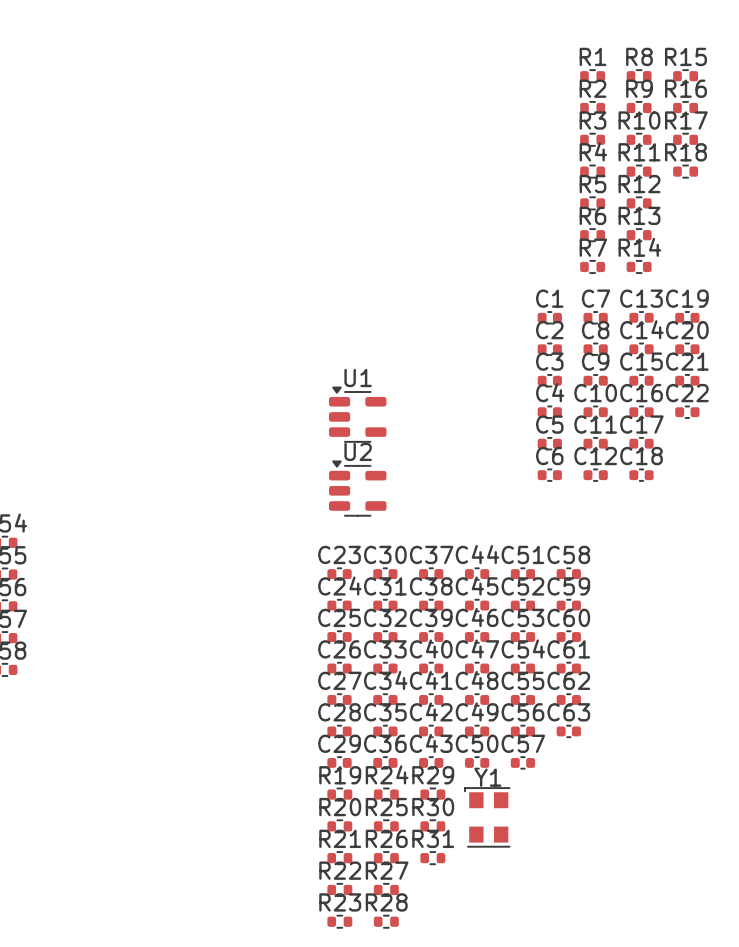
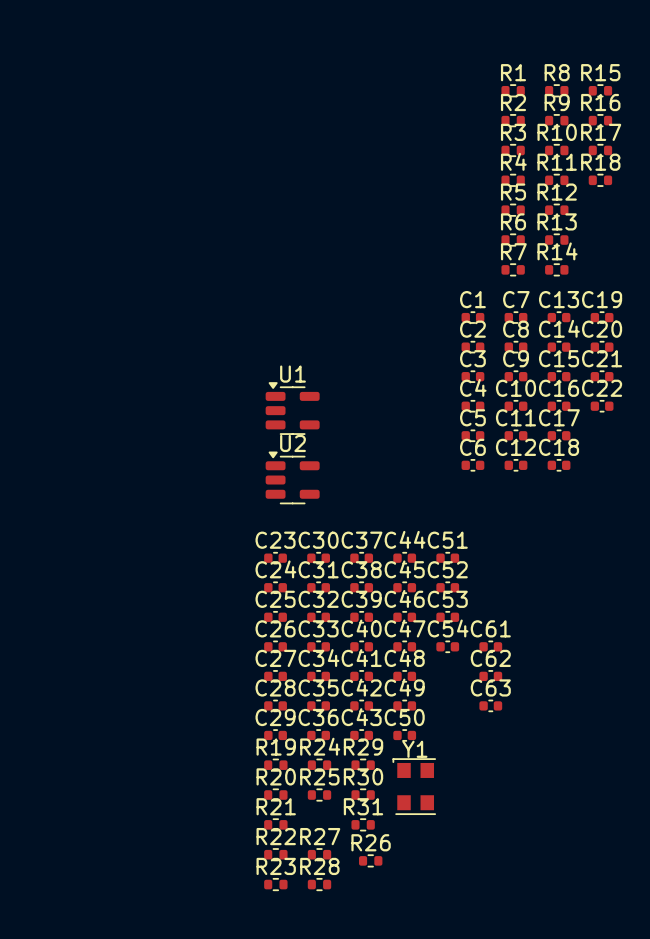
C58: (568, 574) -> none
C59: (568, 605) -> none
C60: (568, 637) -> none
C55: (522, 699) -> none
C56: (522, 731) -> none
C57: (522, 762) -> none
R26 position: (386, 858) -> (370, 860)

